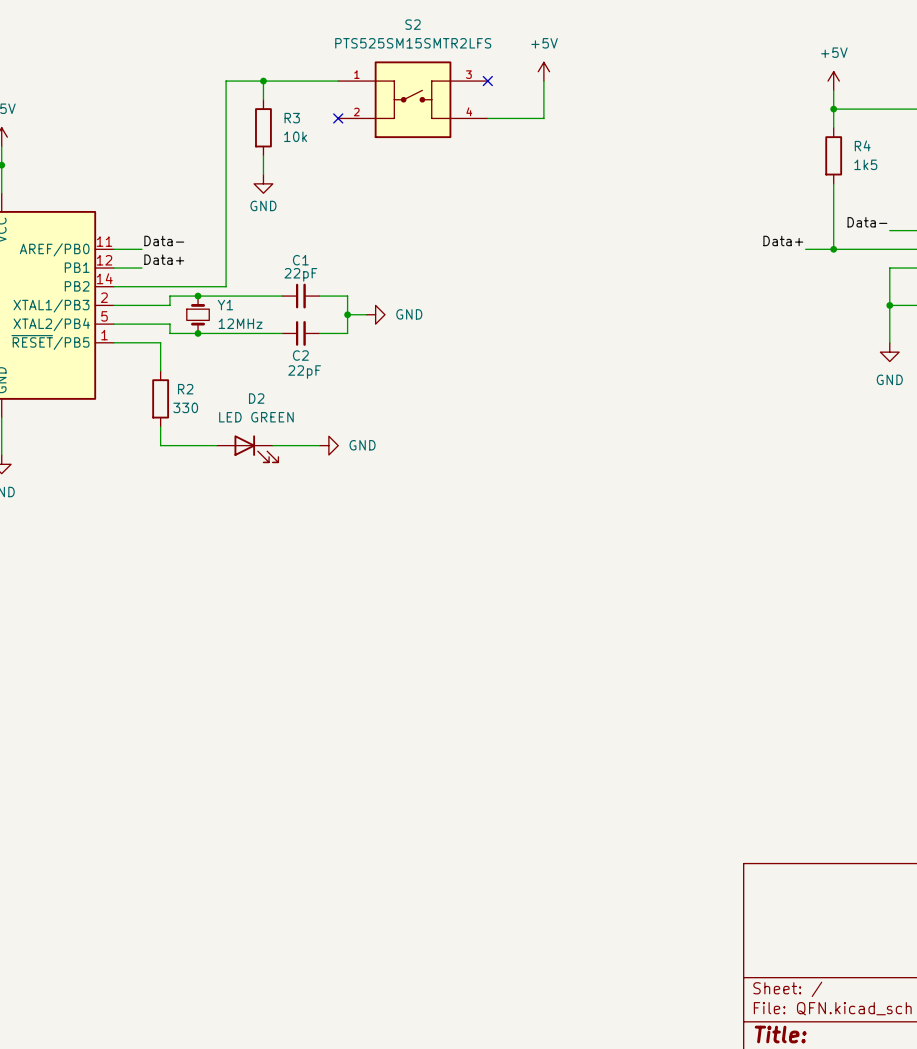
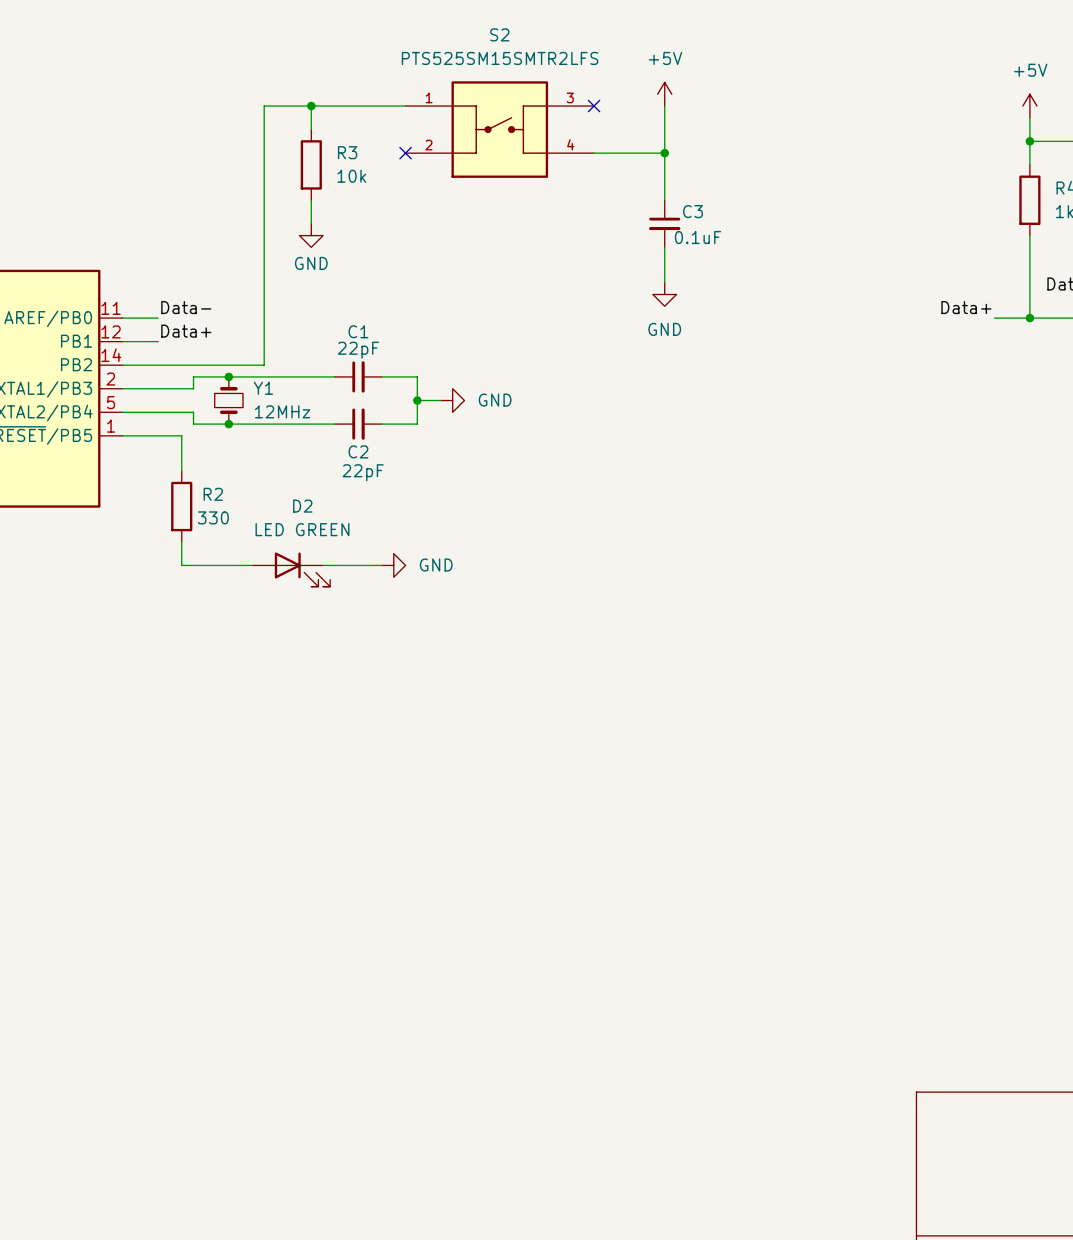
wire: none -> (664, 153) (664, 200)
junction: none -> (664, 153)
C3: none -> 0.1uF (664, 223)
wire: none -> (664, 247) (664, 282)
power symbol: none -> GND (664, 294)

